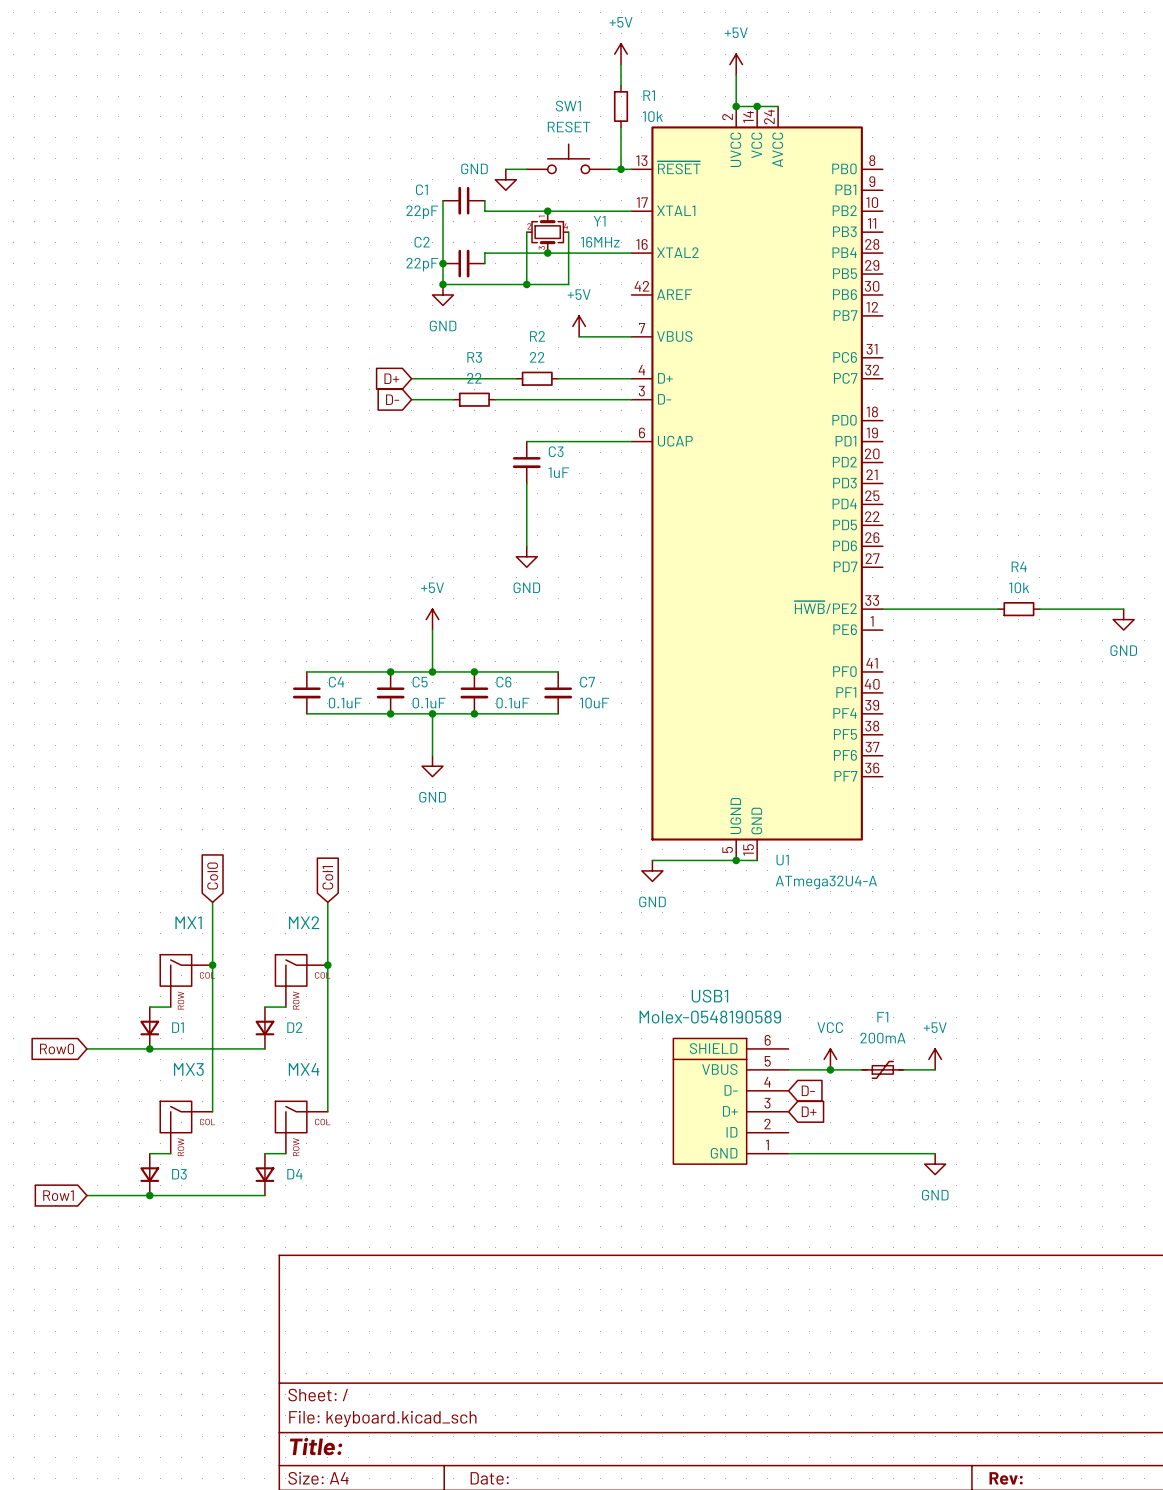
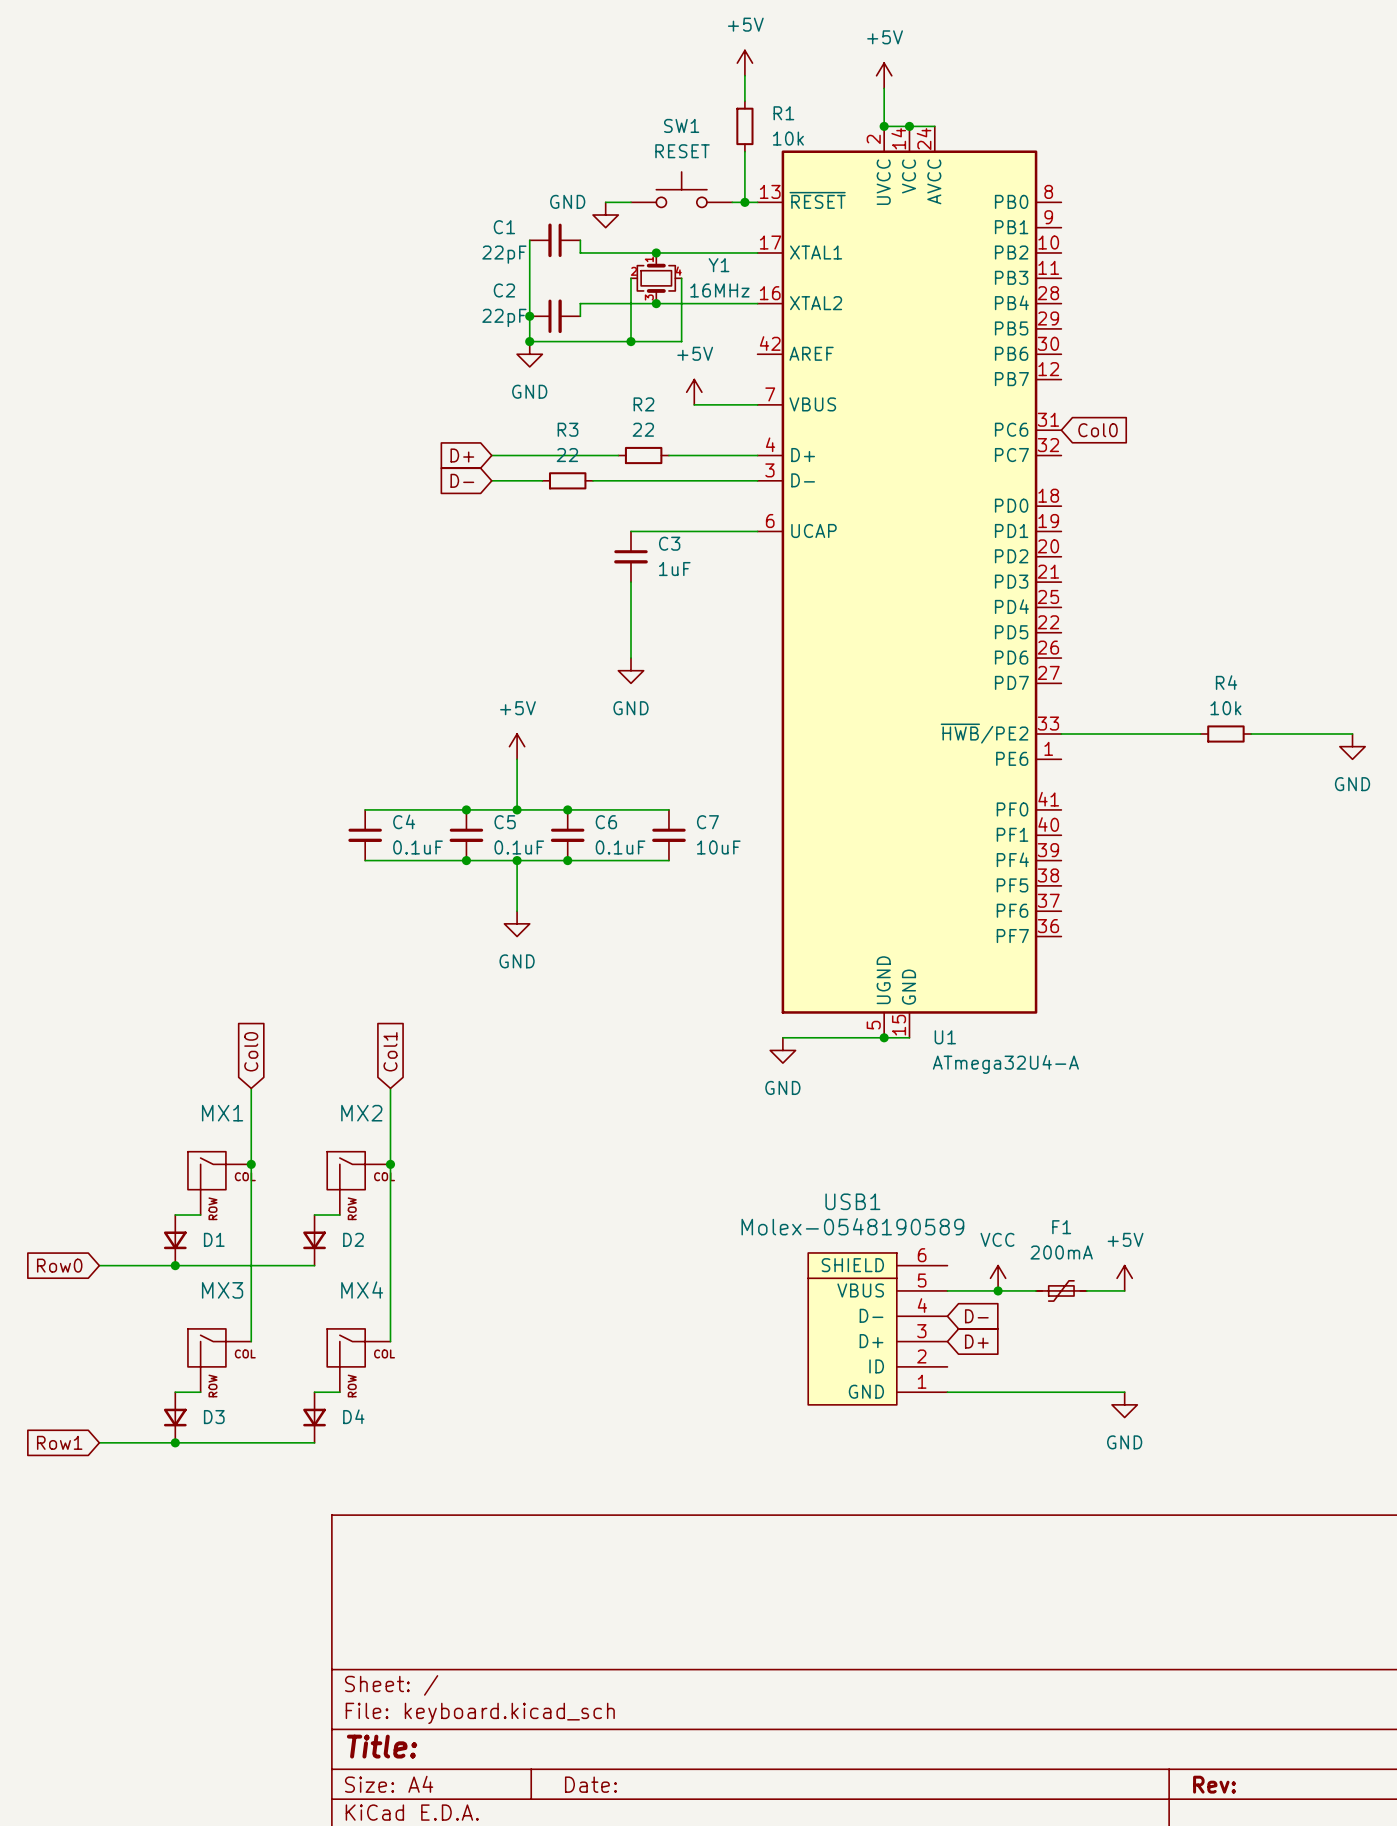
global label: none -> Col0 (1098, 430)

